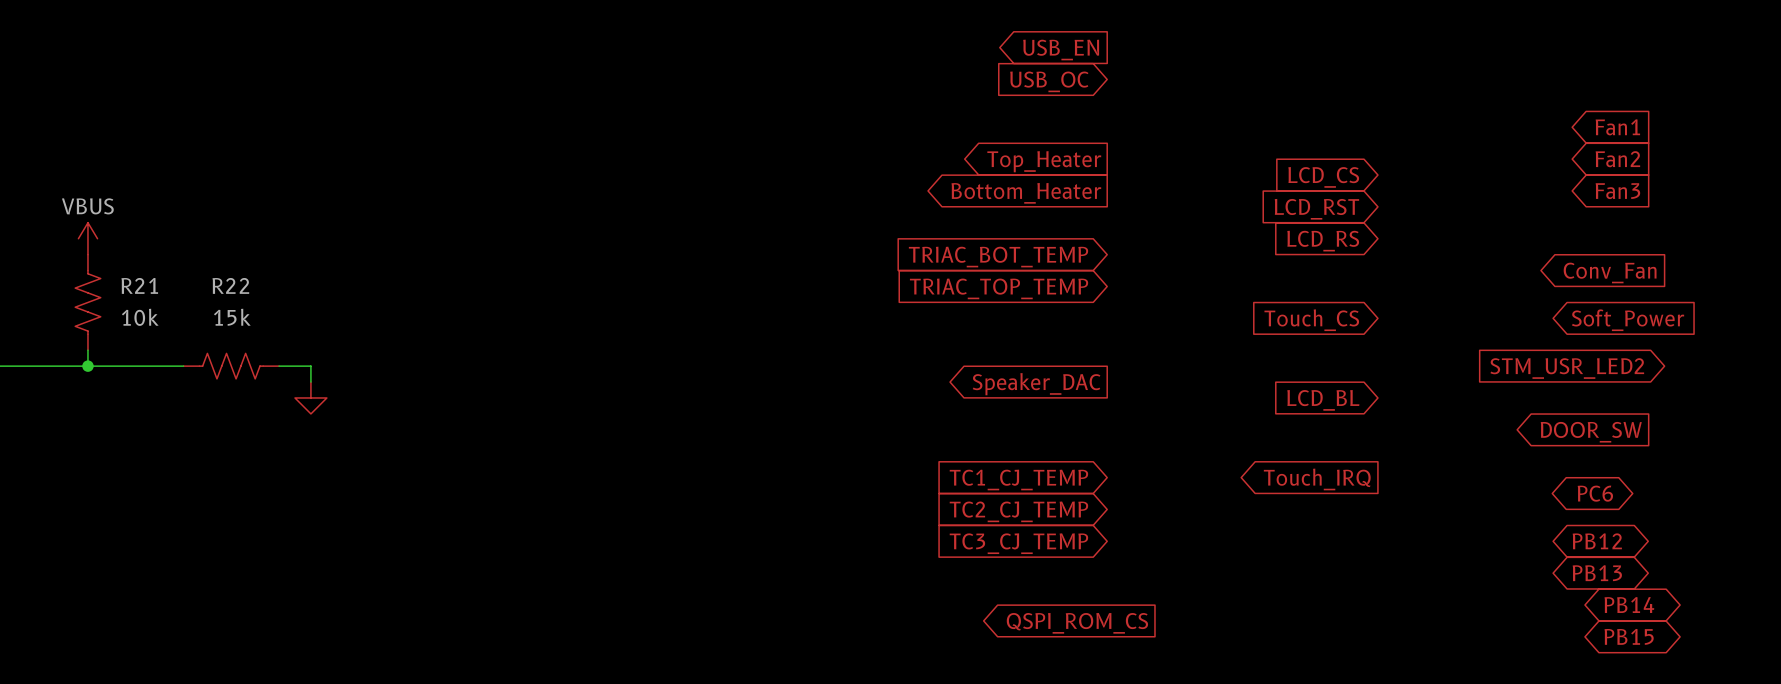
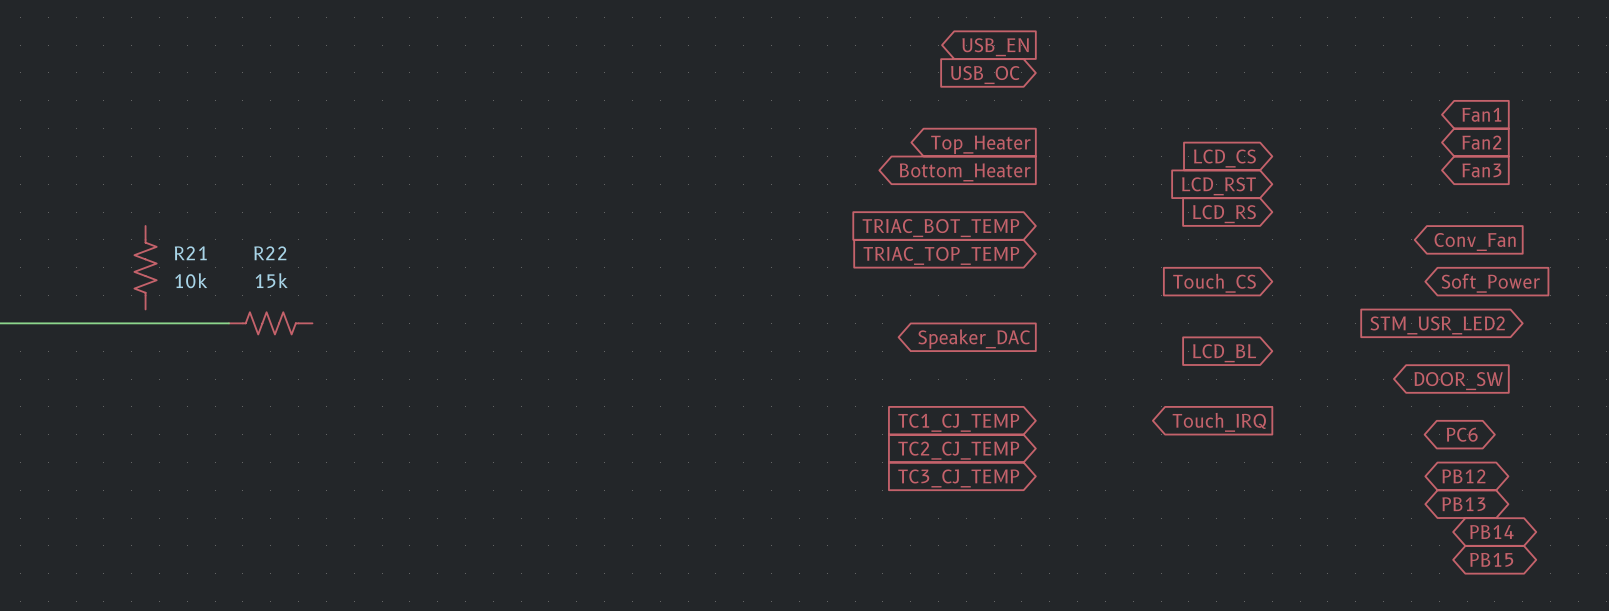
power symbol: VBUS (87, 238) -> none
wire: (87, 350) (87, 366) -> none
junction: (87, 366) -> none
wire: (279, 366) (310, 366) (310, 382) -> none
power symbol: (310, 397) -> none
global label: QSPI_ROM_CS (1077, 623) -> none

